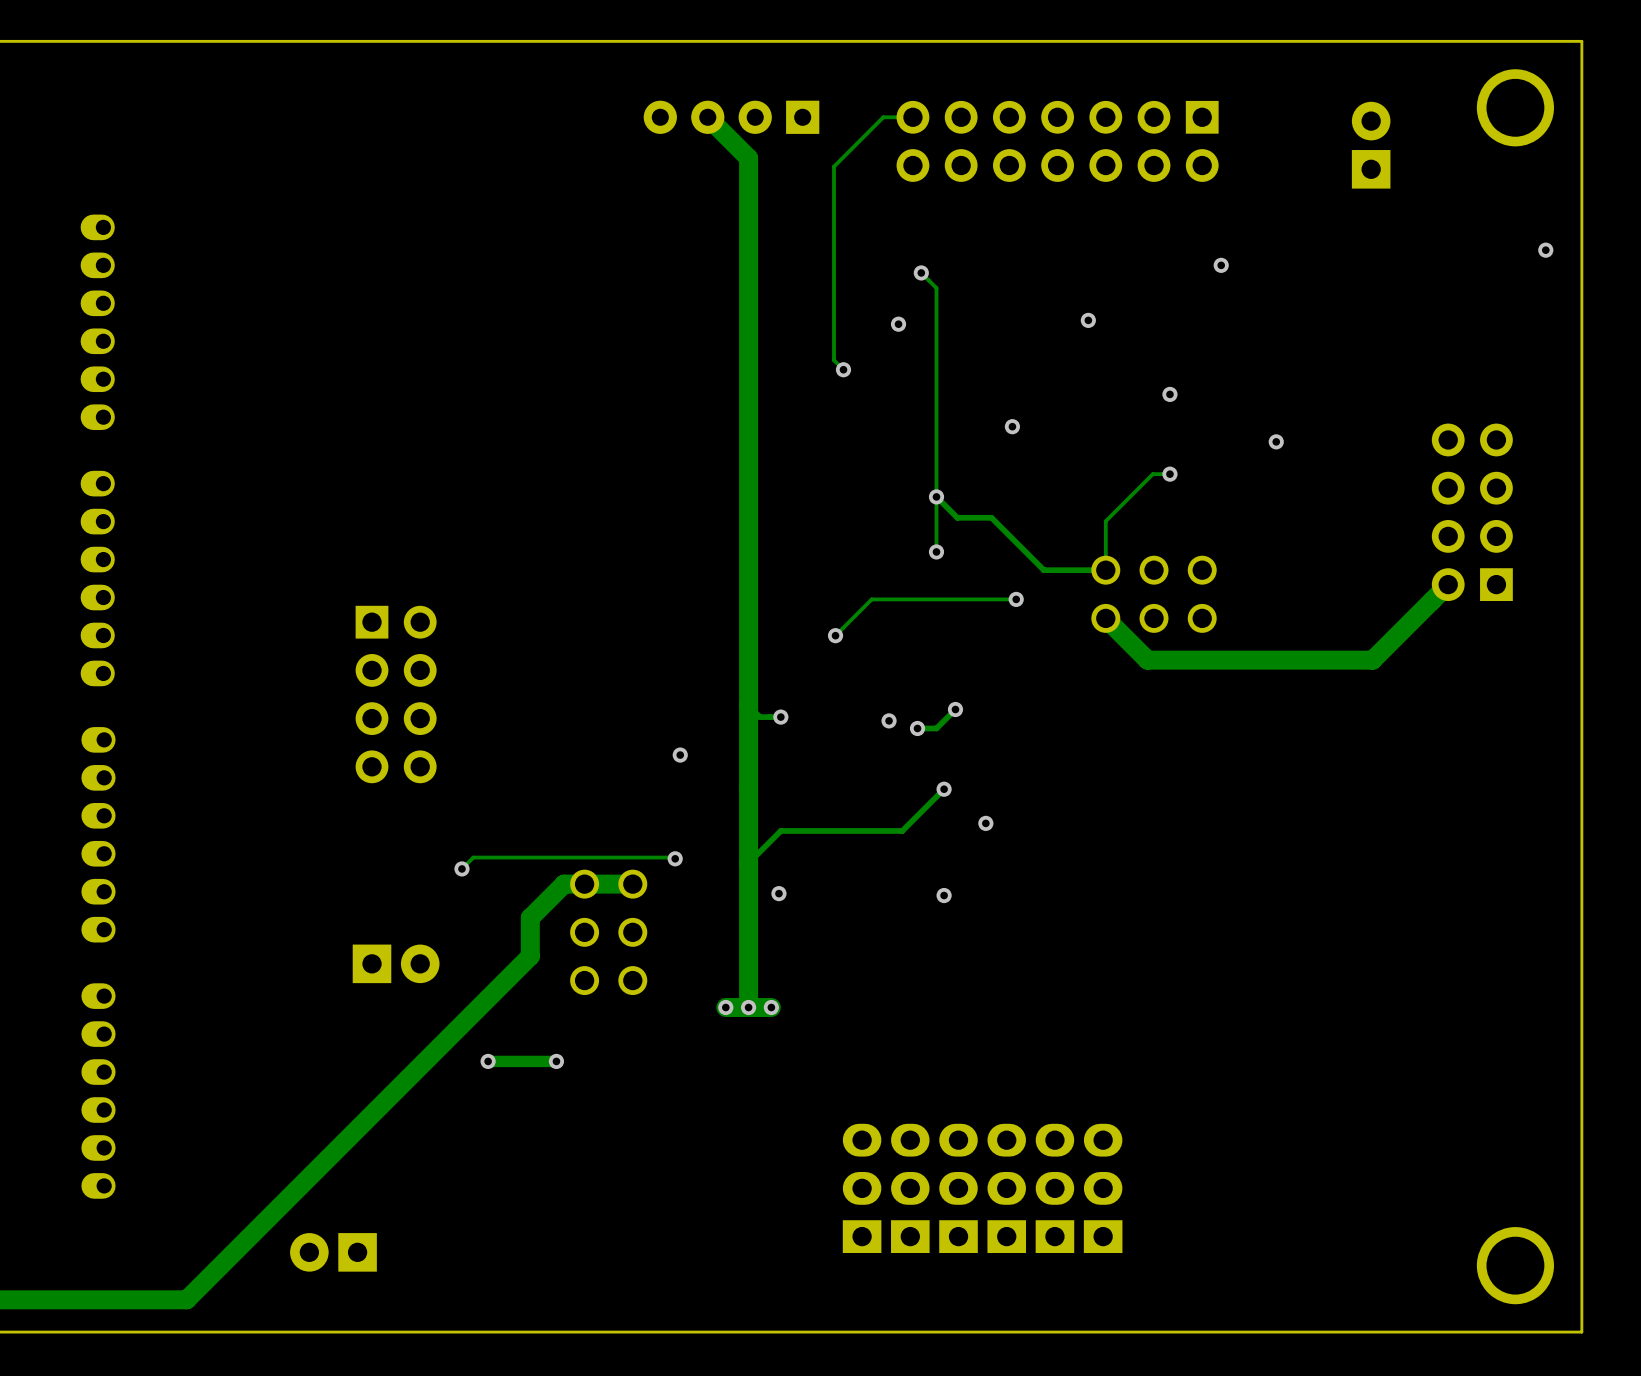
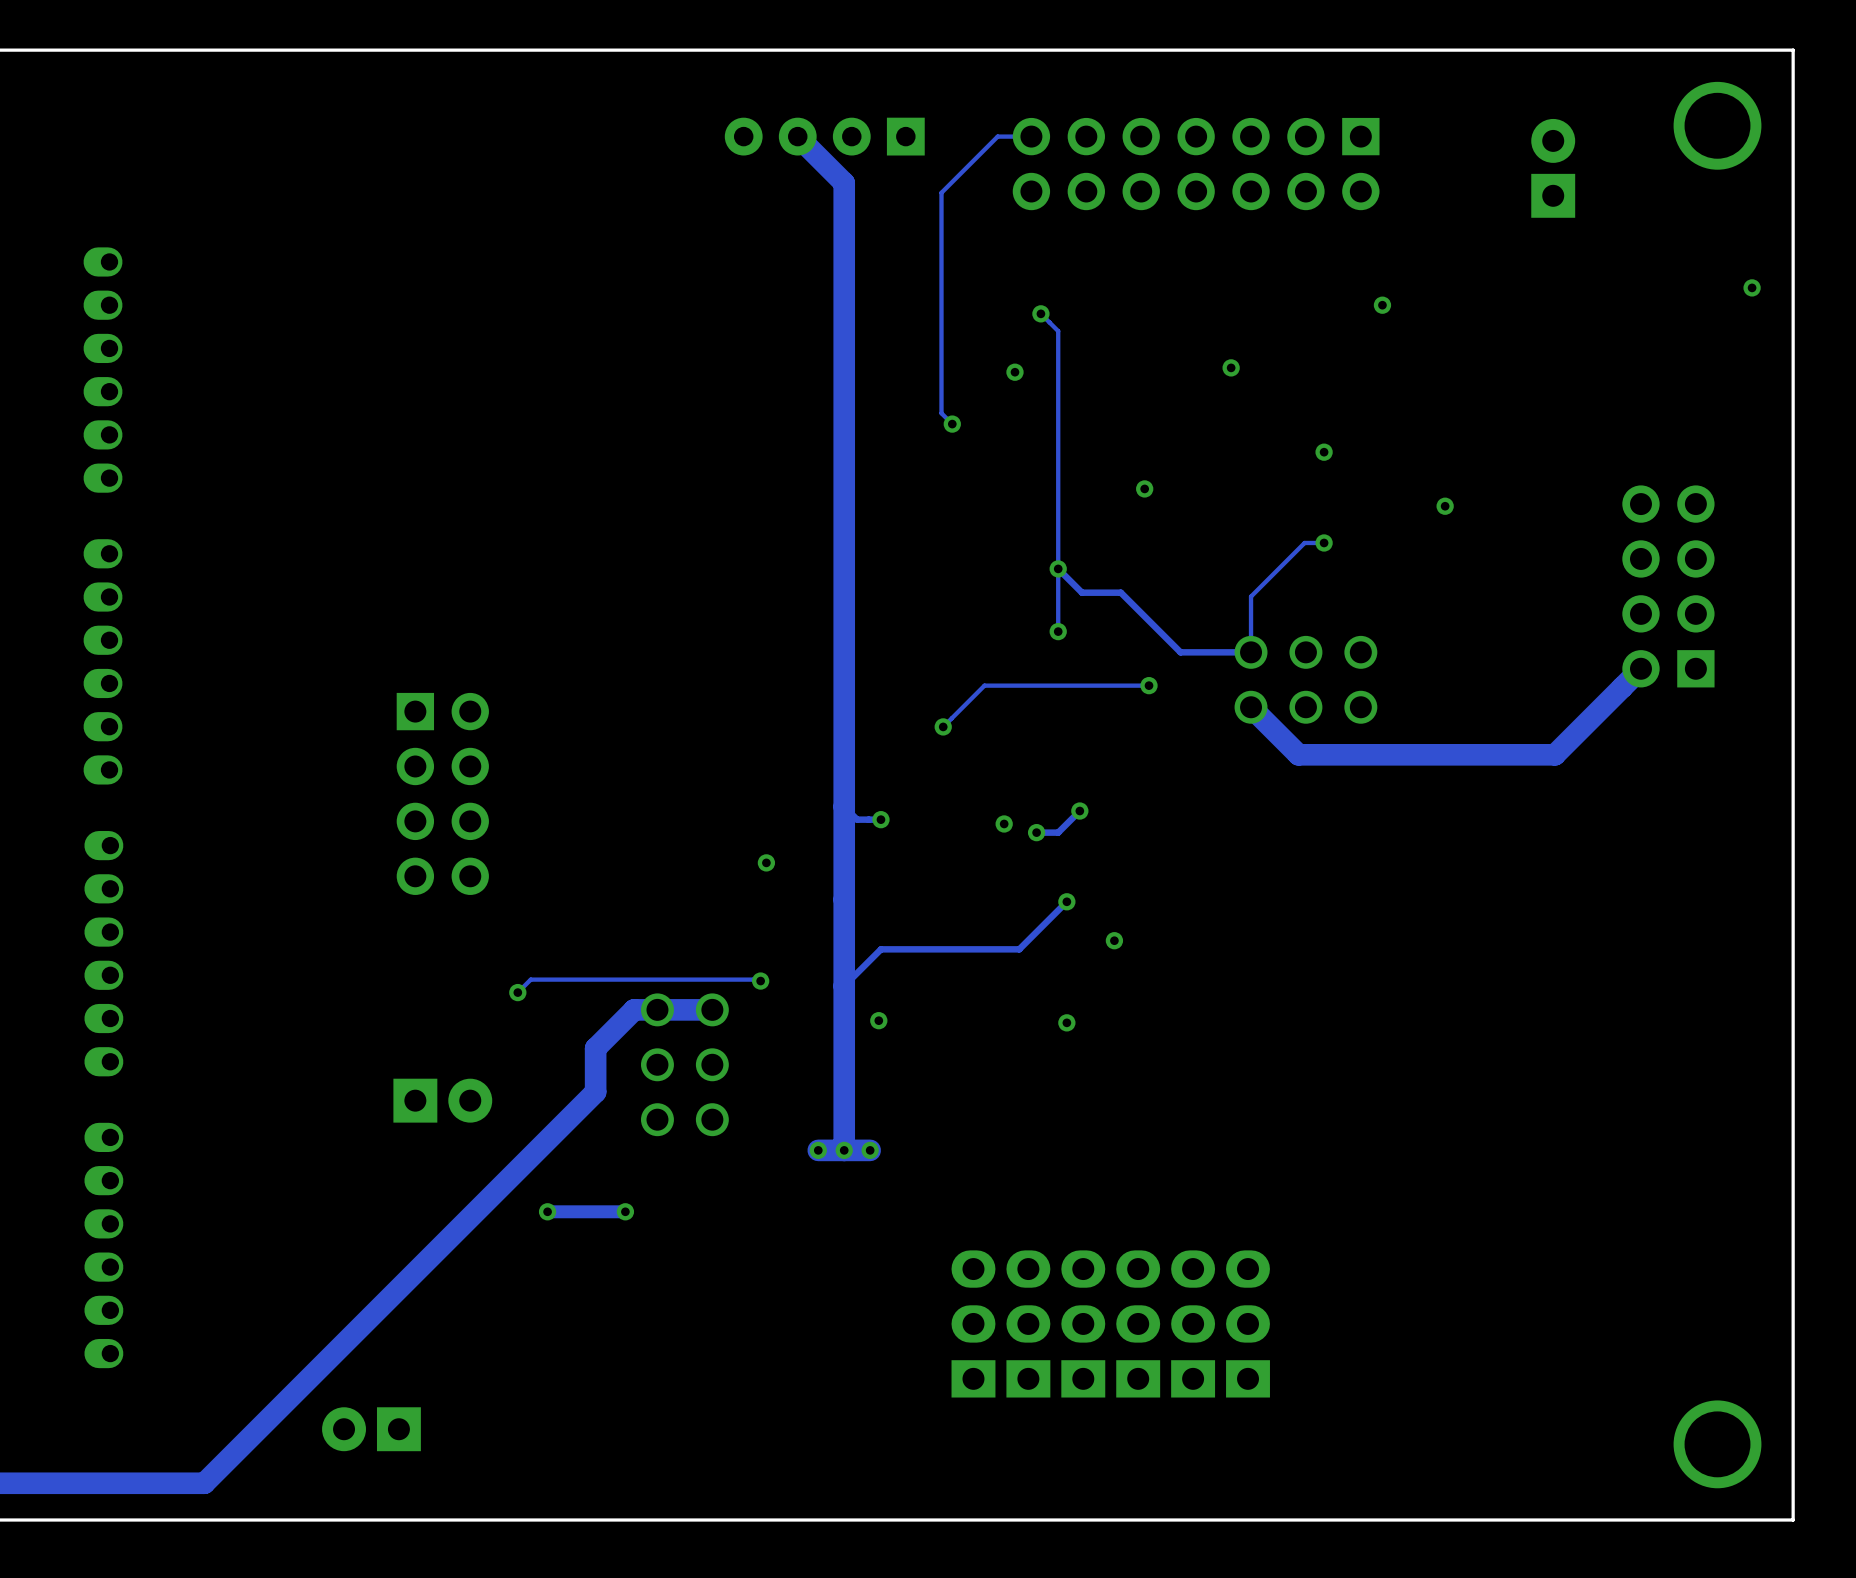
part: none -> (973, 1323)
part: none -> (1028, 1323)
part: none -> (1083, 1323)
part: none -> (1138, 1323)
part: none -> (1193, 1323)
part: none -> (1248, 1323)
part: (862, 1188) -> none
part: (910, 1188) -> none
part: (958, 1188) -> none
part: (1006, 1188) -> none
part: (1054, 1188) -> none
part: (1103, 1188) -> none

